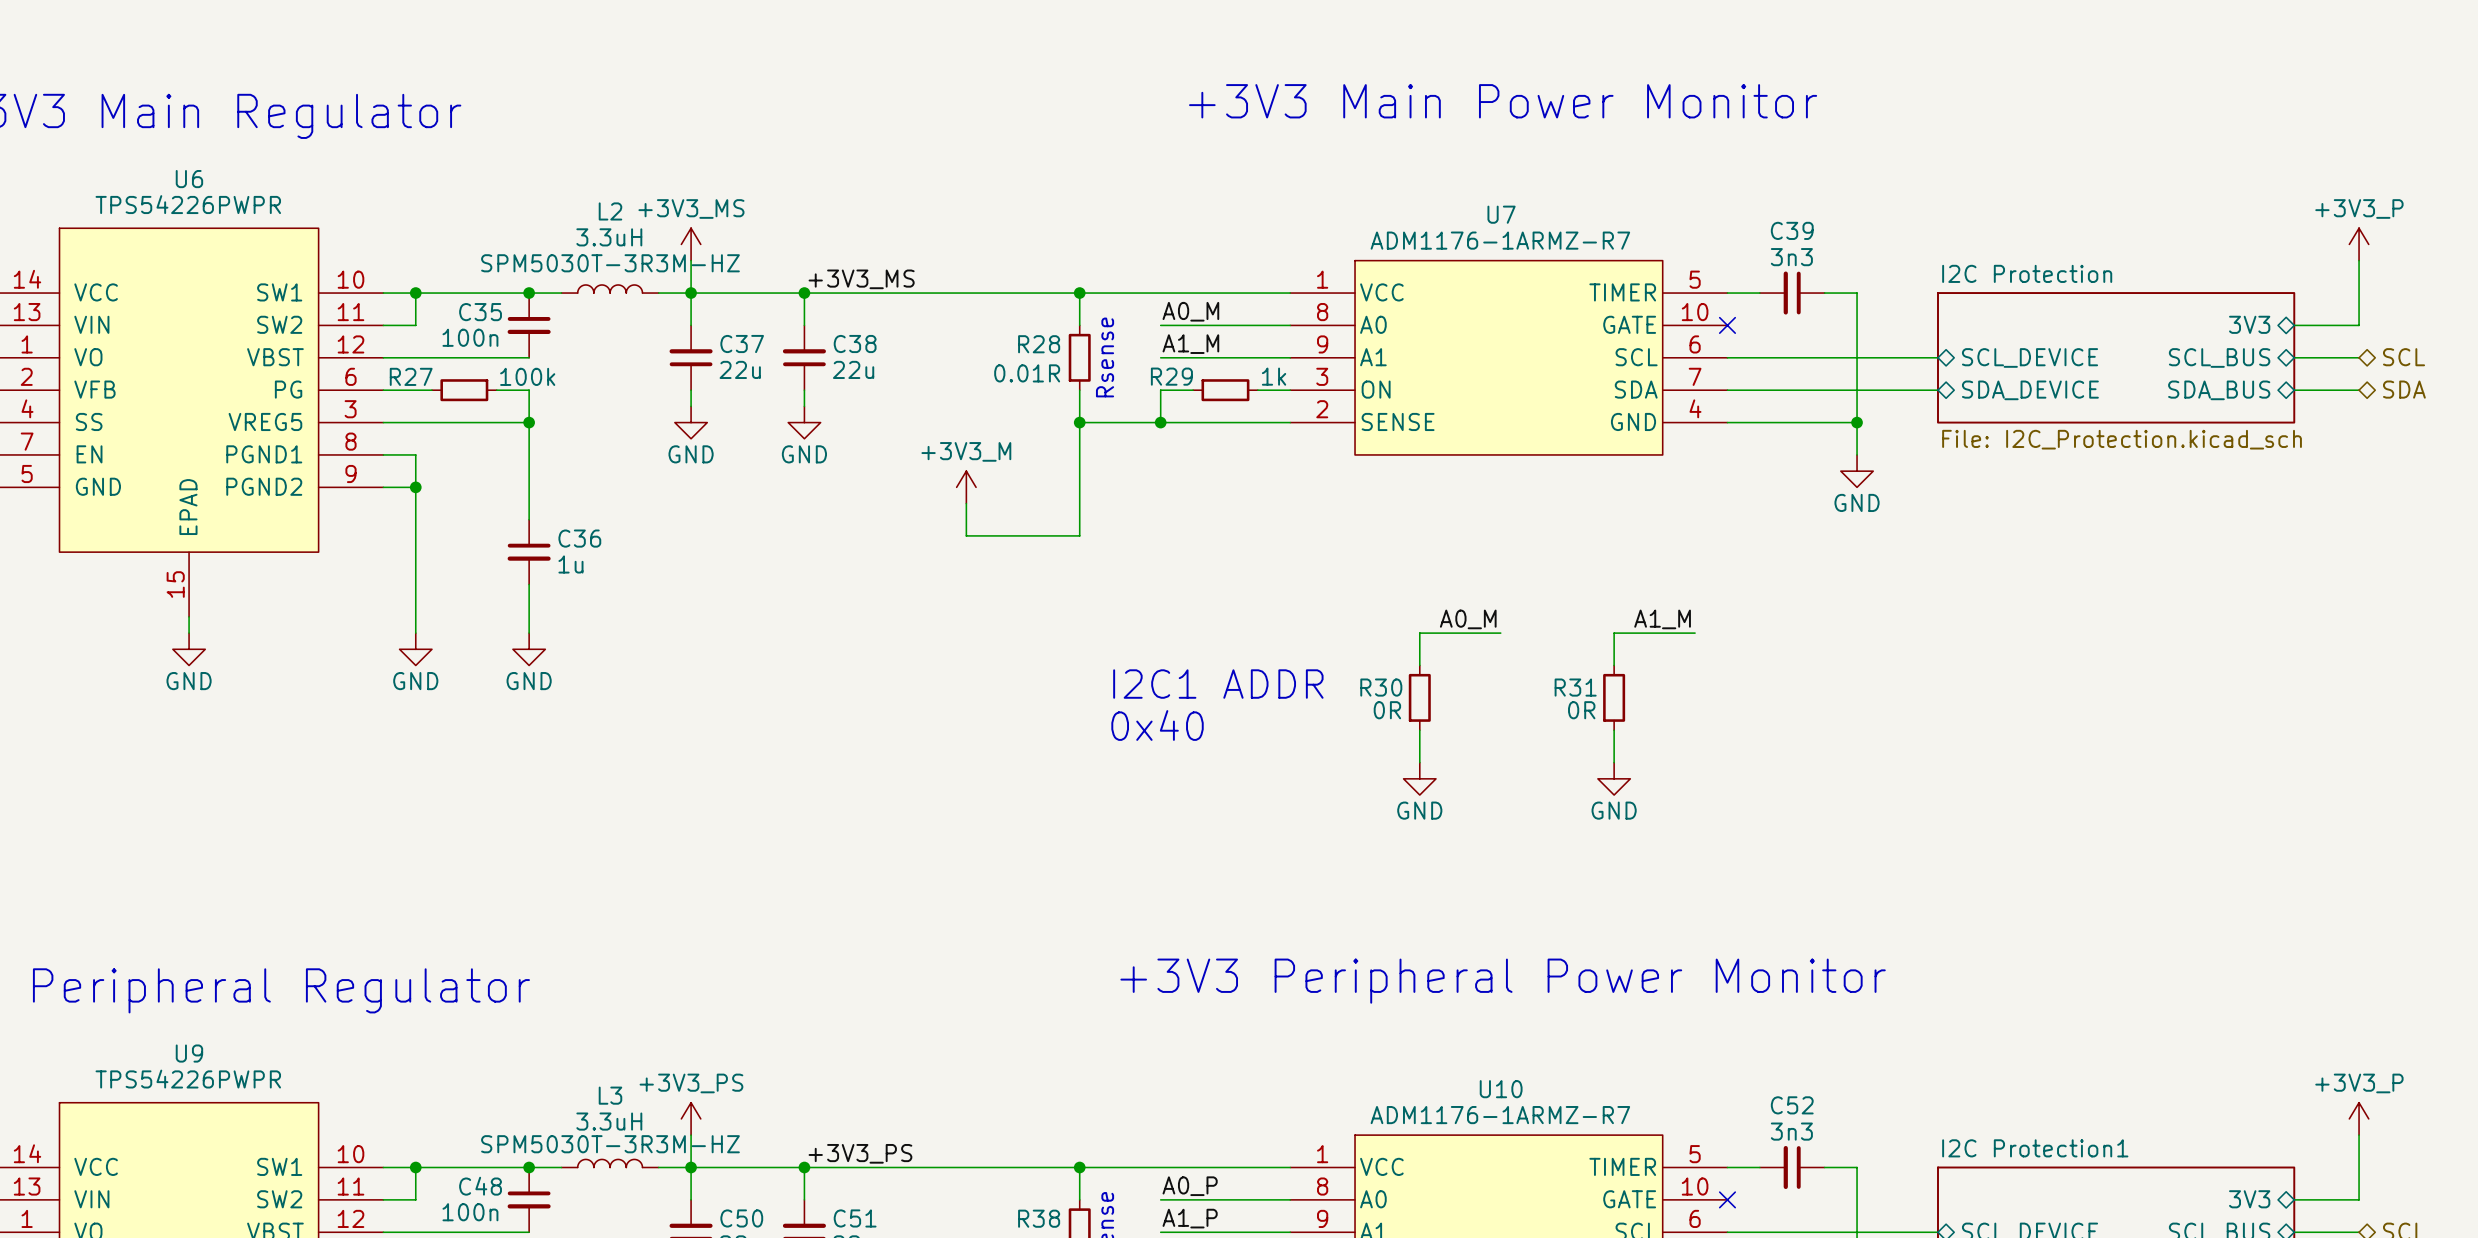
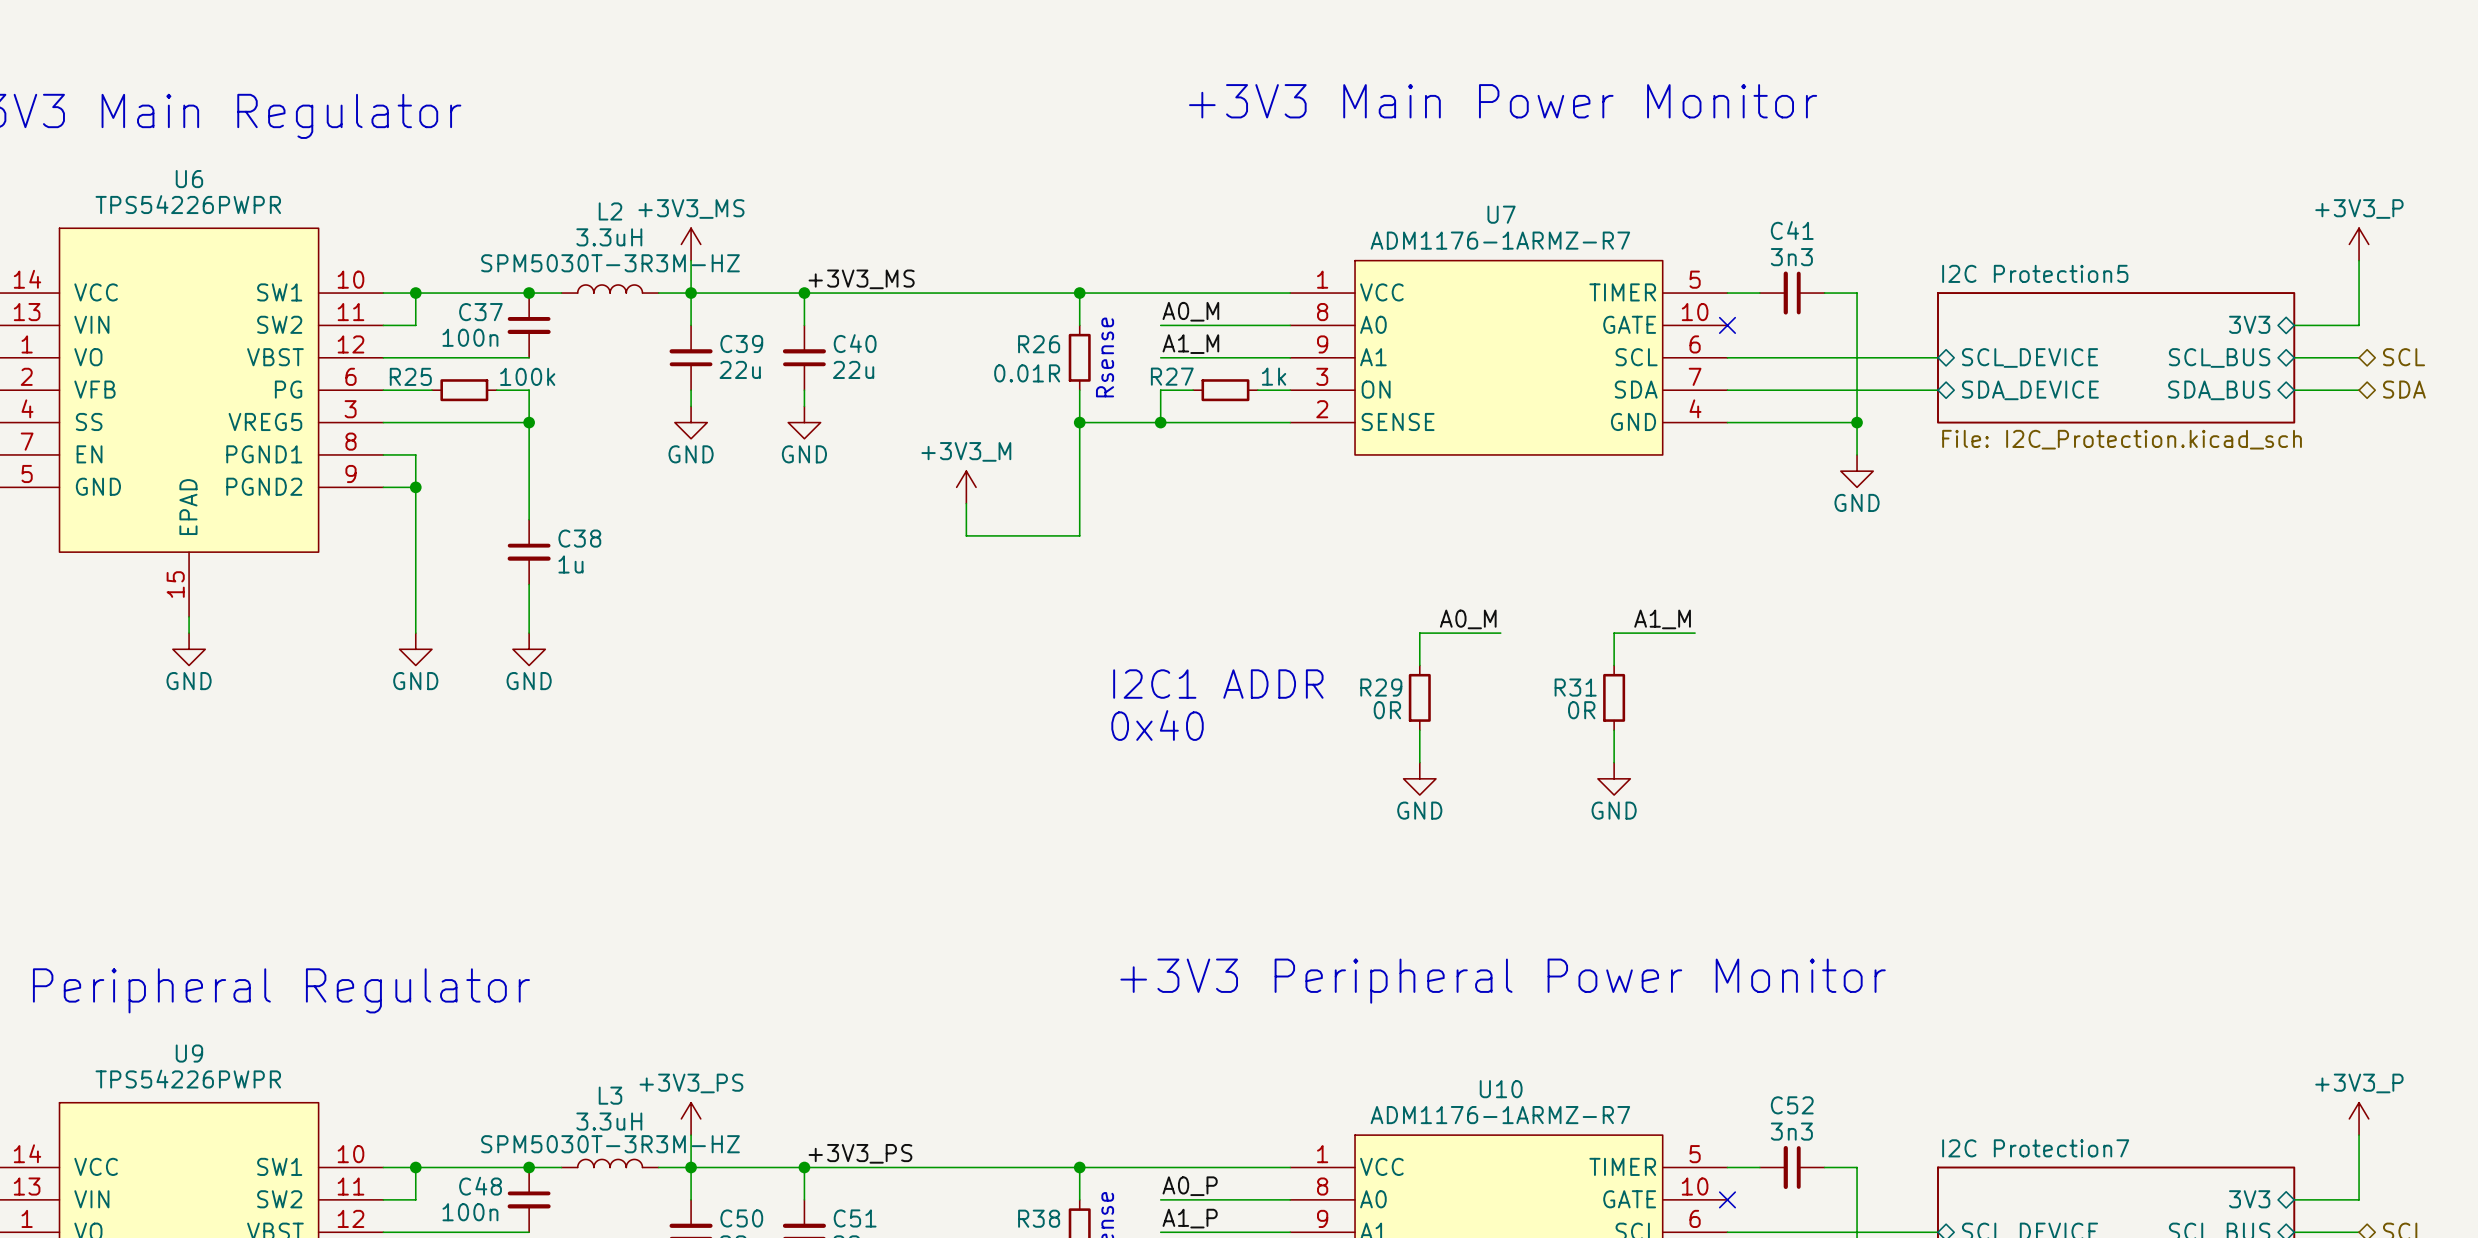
C39 name: C39 (1792, 230) -> C41 (1792, 230)
sheet I2C Protection name: I2C Protection (2027, 273) -> I2C Protection5 (2035, 273)
C35 name: C35 (480, 312) -> C37 (480, 312)
C37 name: C37 (742, 344) -> C39 (741, 344)
C38 name: C38 (855, 344) -> C40 (855, 343)
R28 name: R28 (1039, 344) -> R26 (1039, 344)
R27 name: R27 (411, 376) -> R25 (410, 376)
R29 name: R29 (1171, 376) -> R27 (1172, 376)
C36 name: C36 (579, 538) -> C38 (579, 538)
R30 name: R30 (1381, 687) -> R29 (1381, 687)
sheet I2C Protection1 name: I2C Protection1 (2035, 1148) -> I2C Protection7 (2035, 1148)

